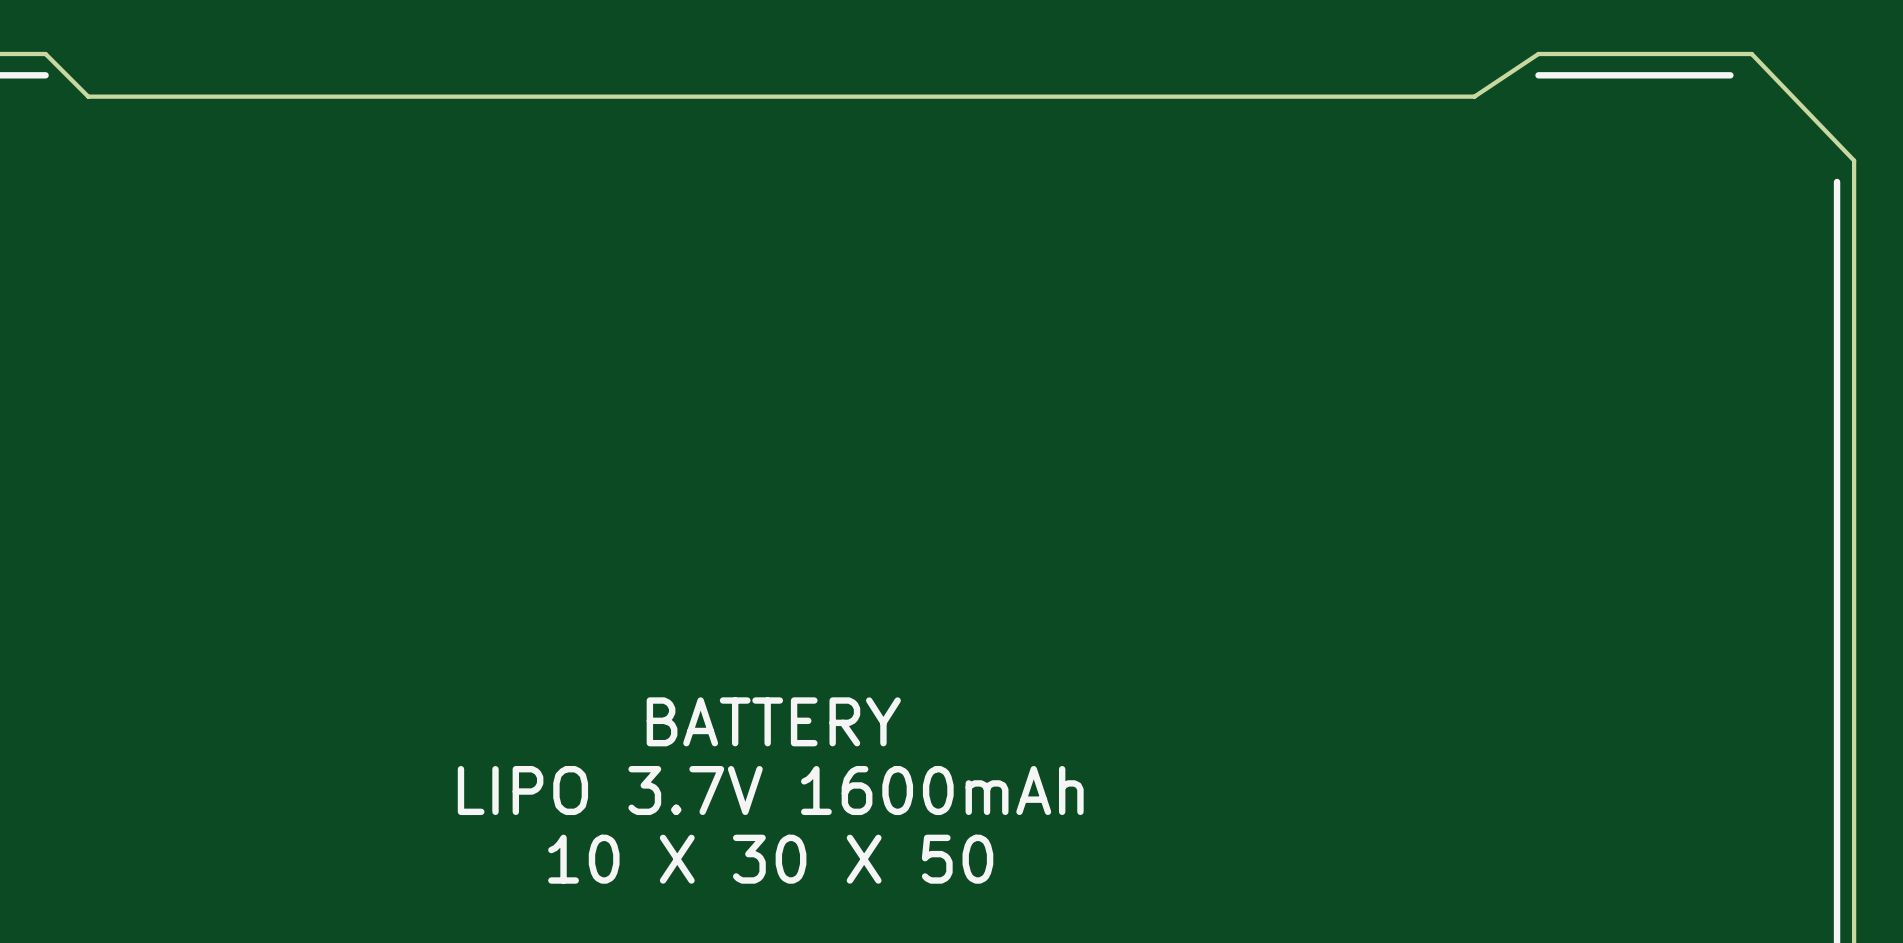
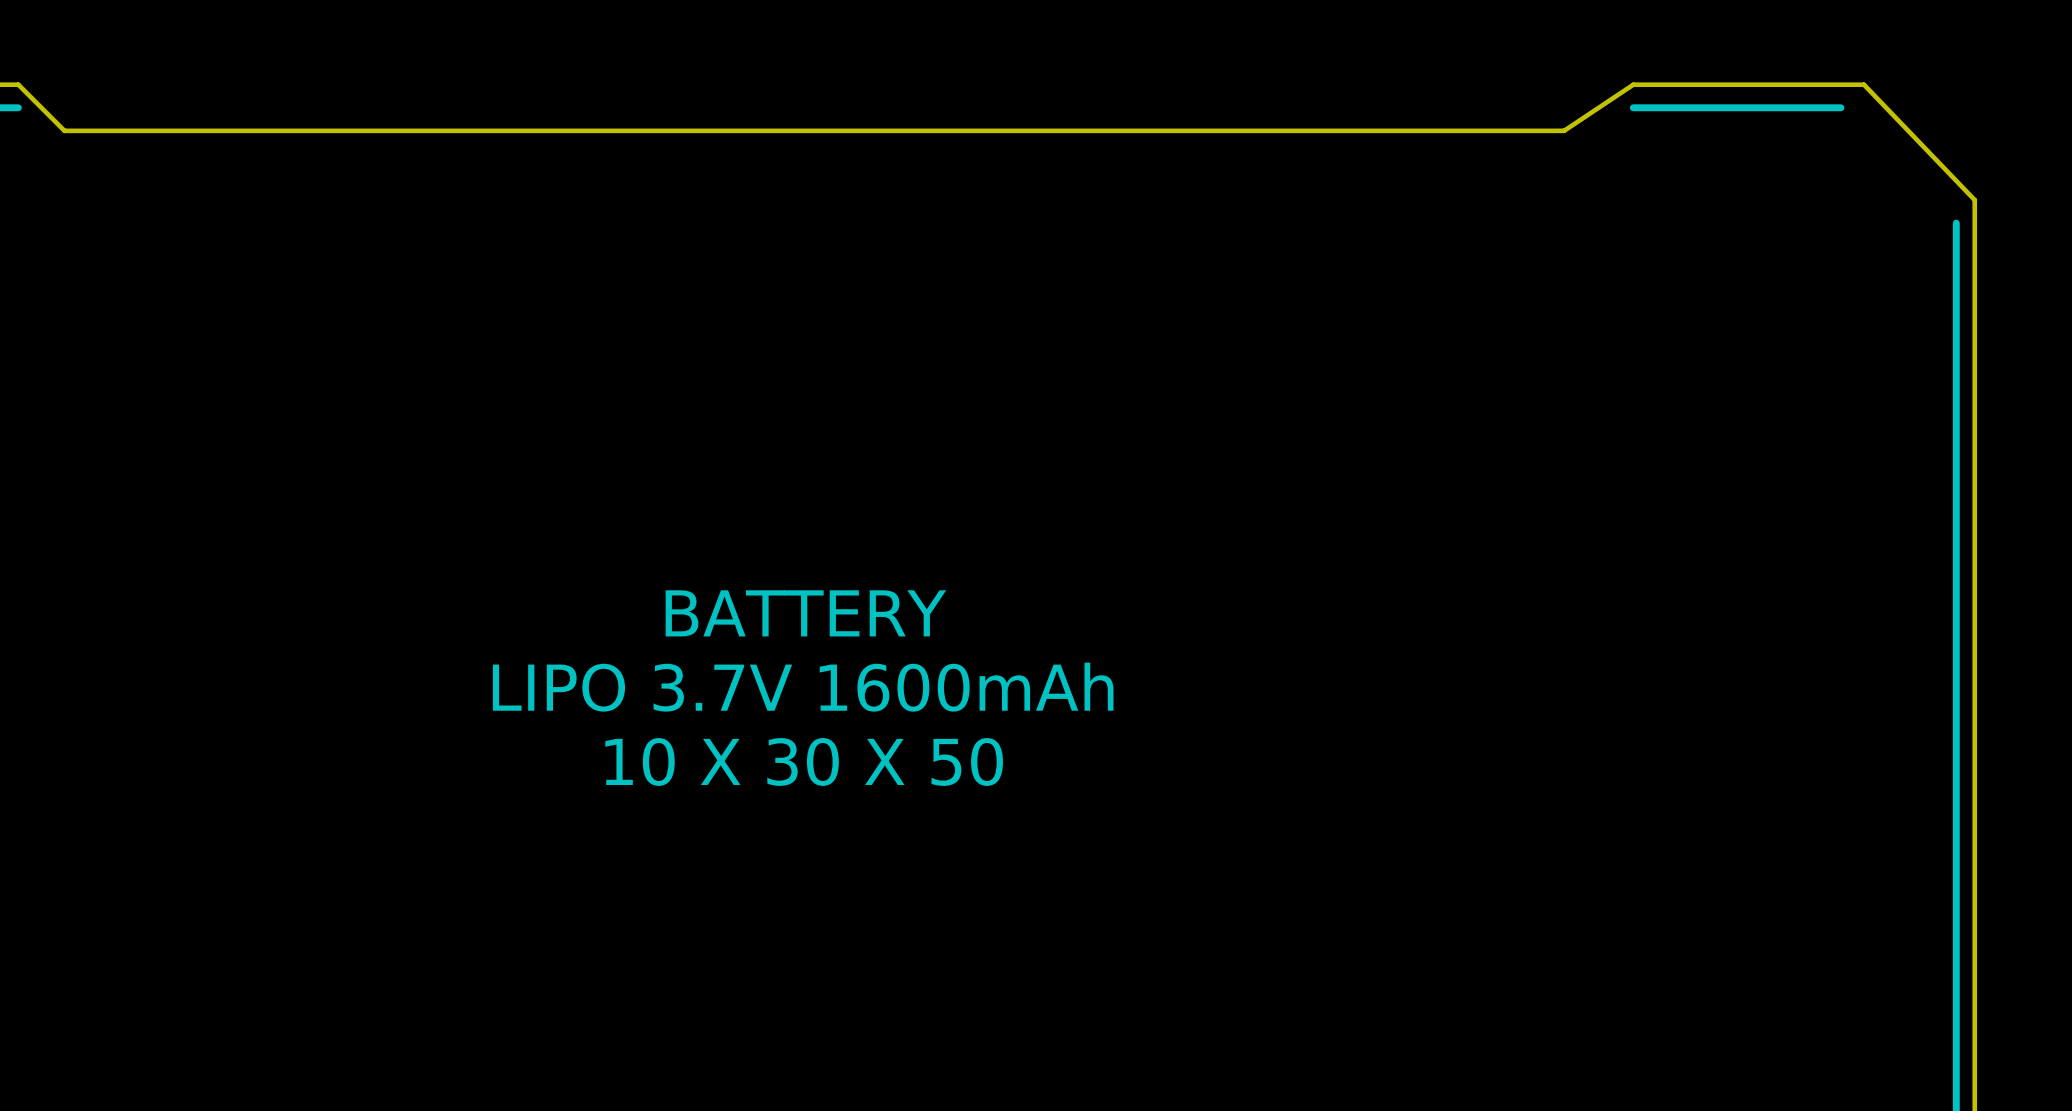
text position: BATTERY (773, 721) -> BATTERY (805, 613)
text position: LIPO 3.7V 1600mAh (770, 790) -> LIPO 3.7V 1600mAh (803, 687)
text position: 10 X 30 X 50 (770, 859) -> 10 X 30 X 50 (804, 761)

